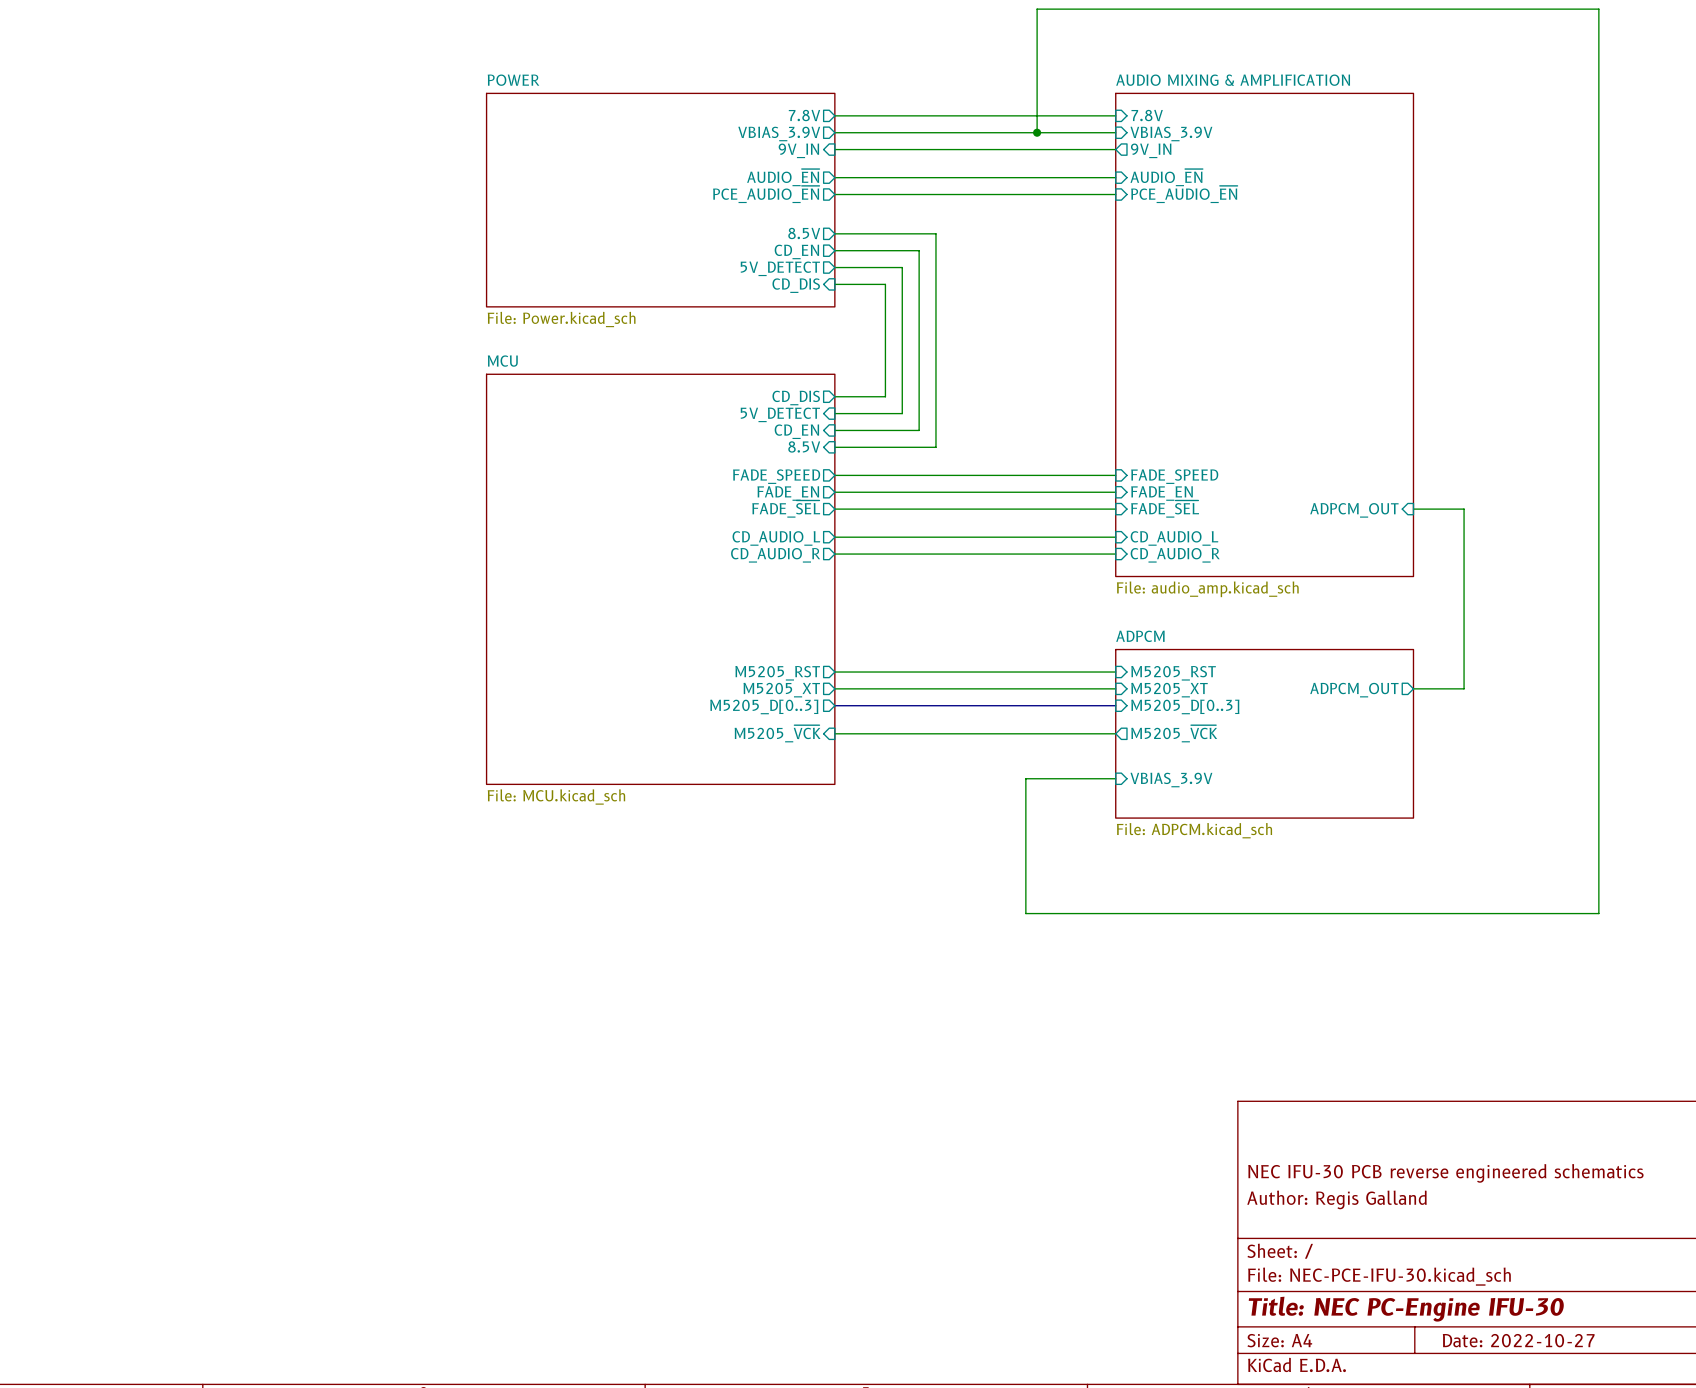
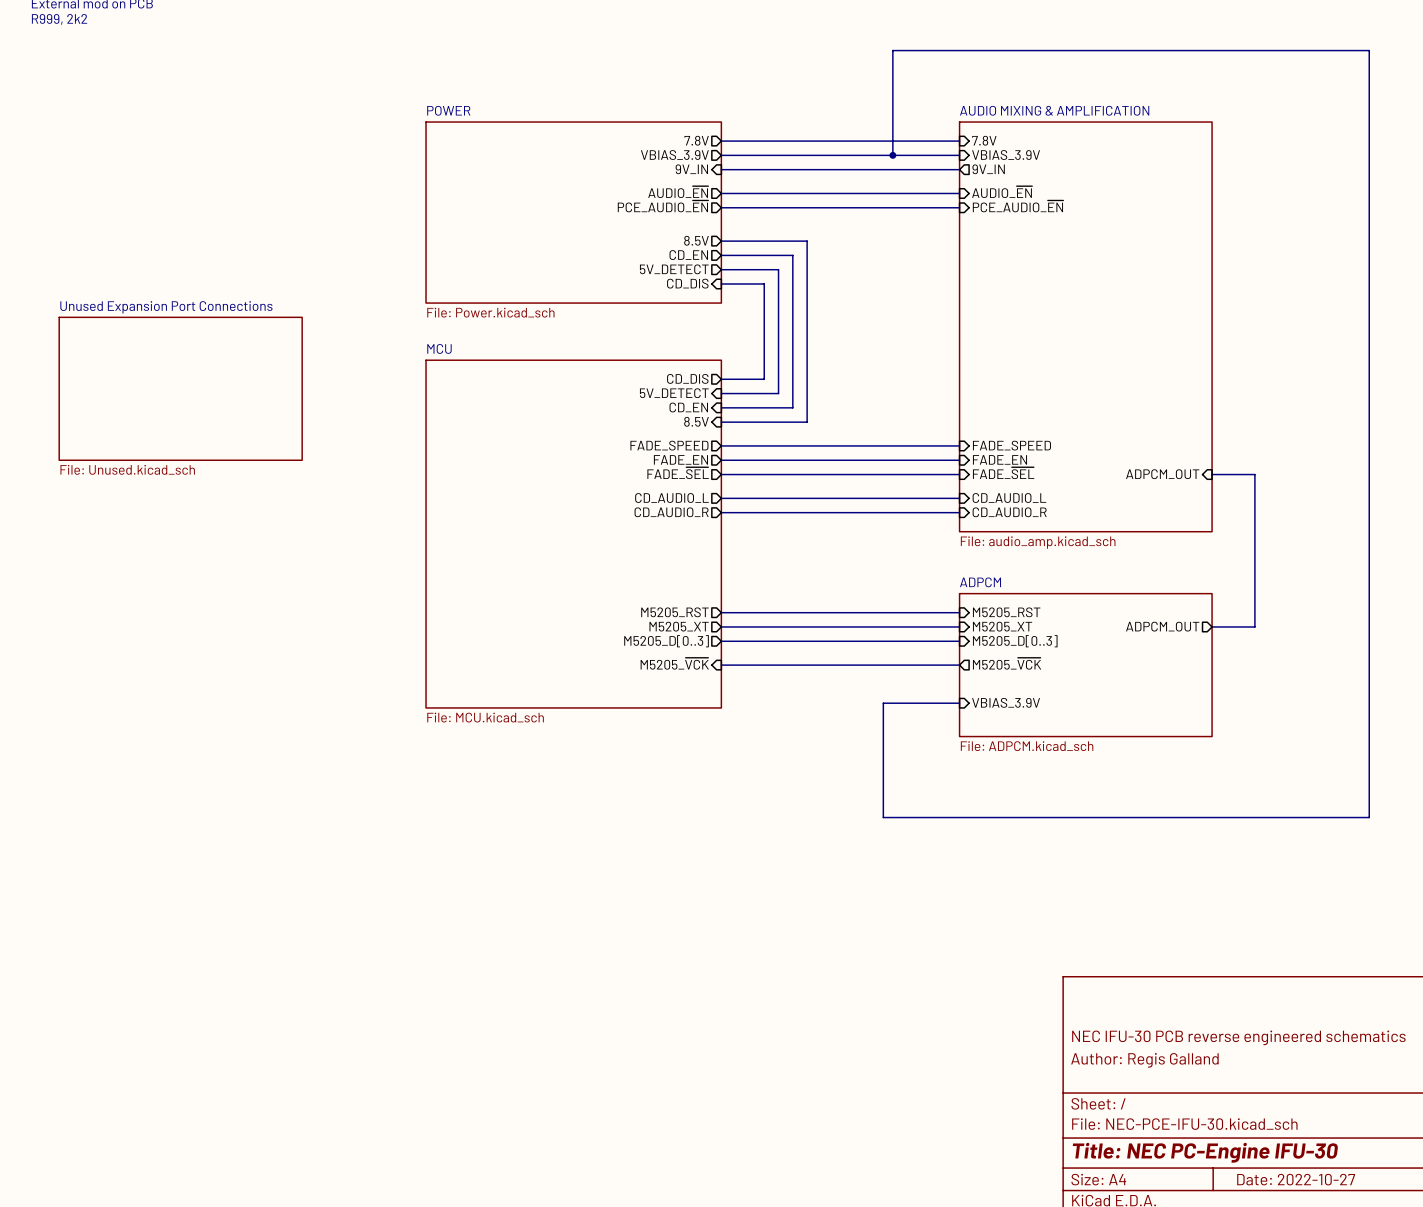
sheet Unused Expansion Port Connections: none -> File: Unused.kicad_sch (180, 388)

